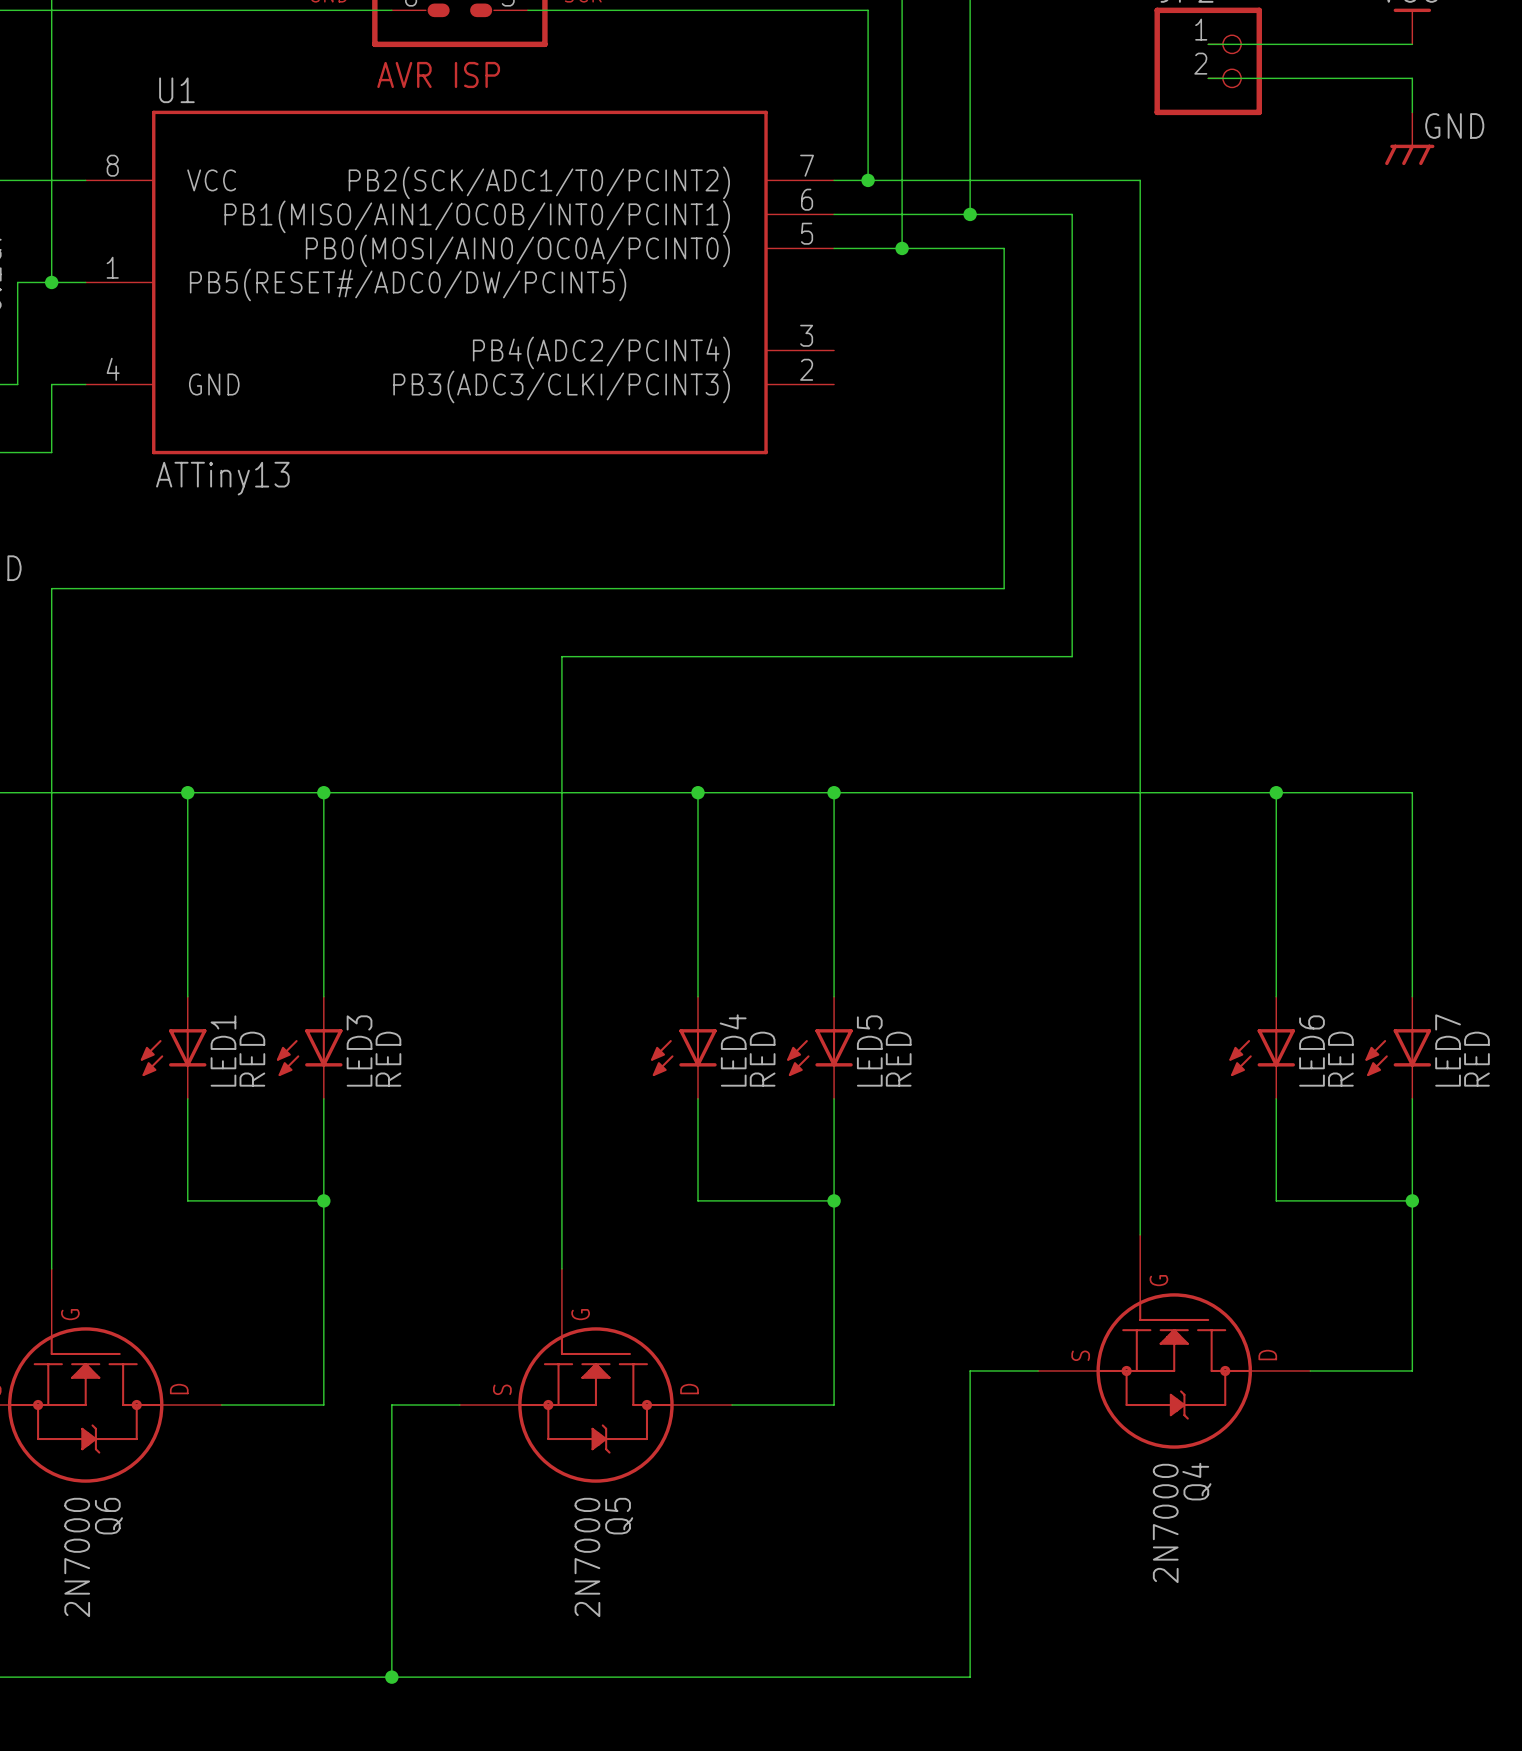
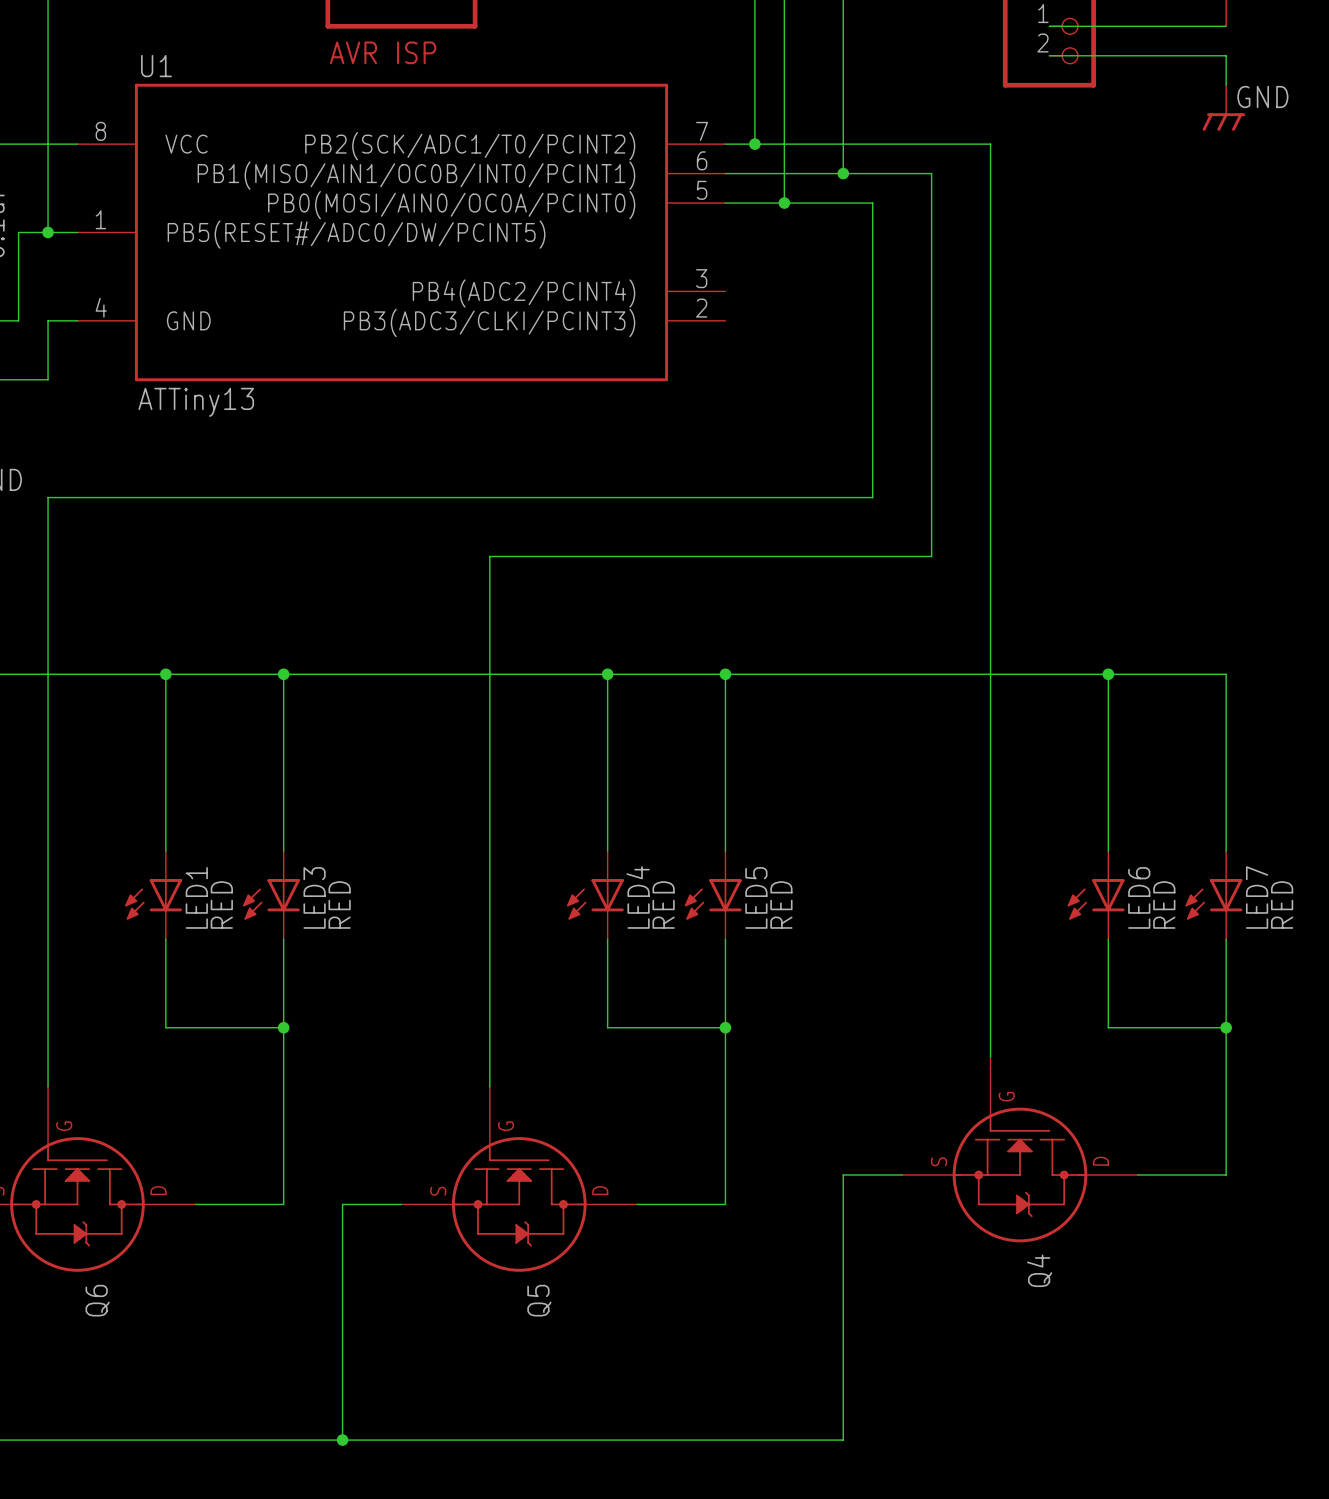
Q4 value: 2N7000 (1165, 1523) -> none
Q6 value: 2N7000 (77, 1557) -> none
Q5 value: 2N7000 (587, 1557) -> none

